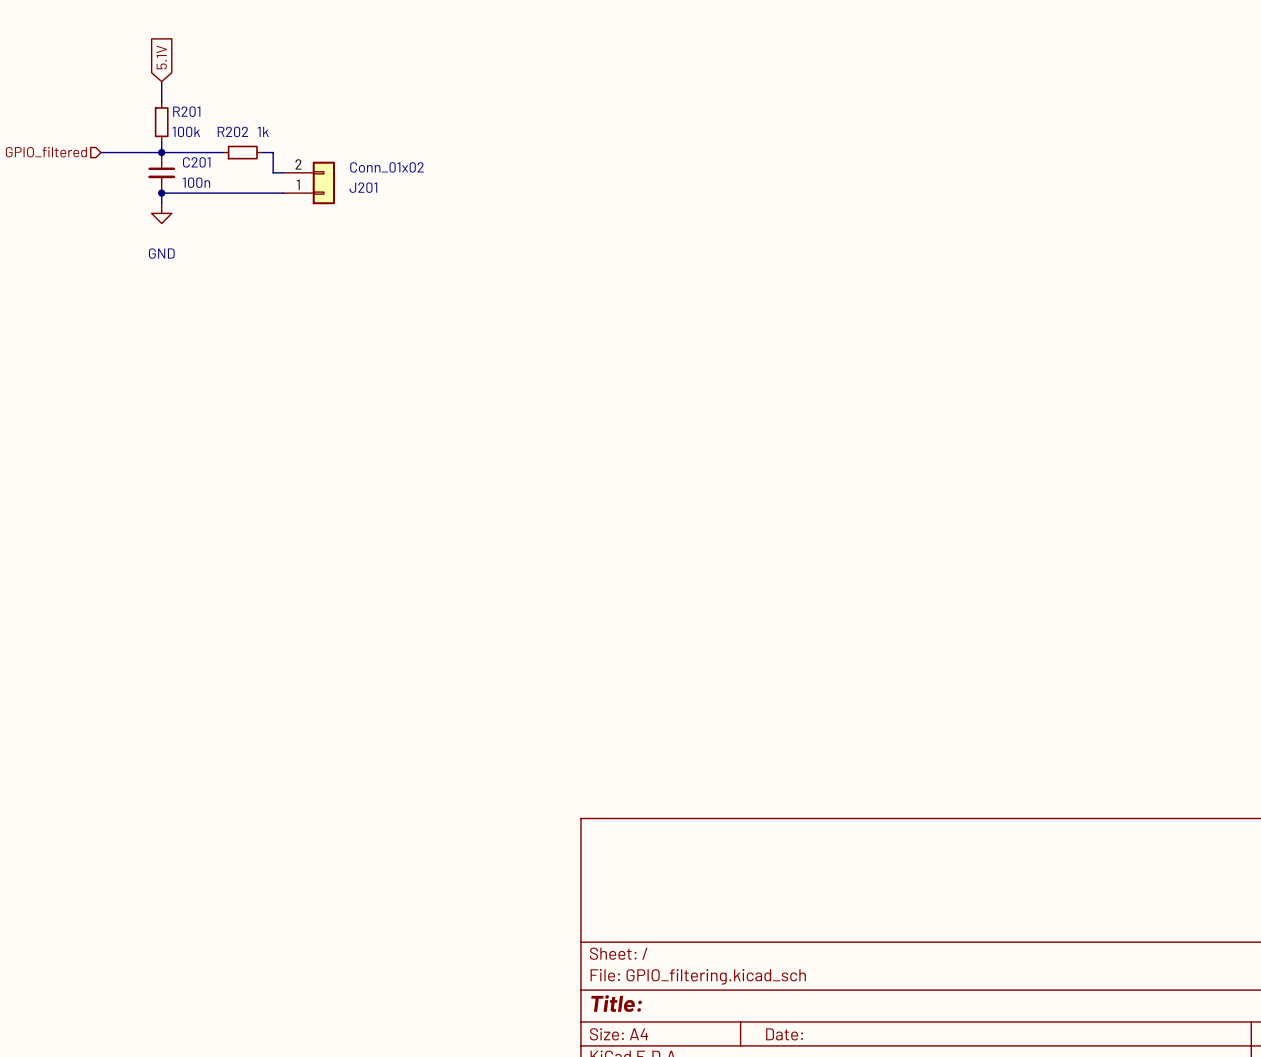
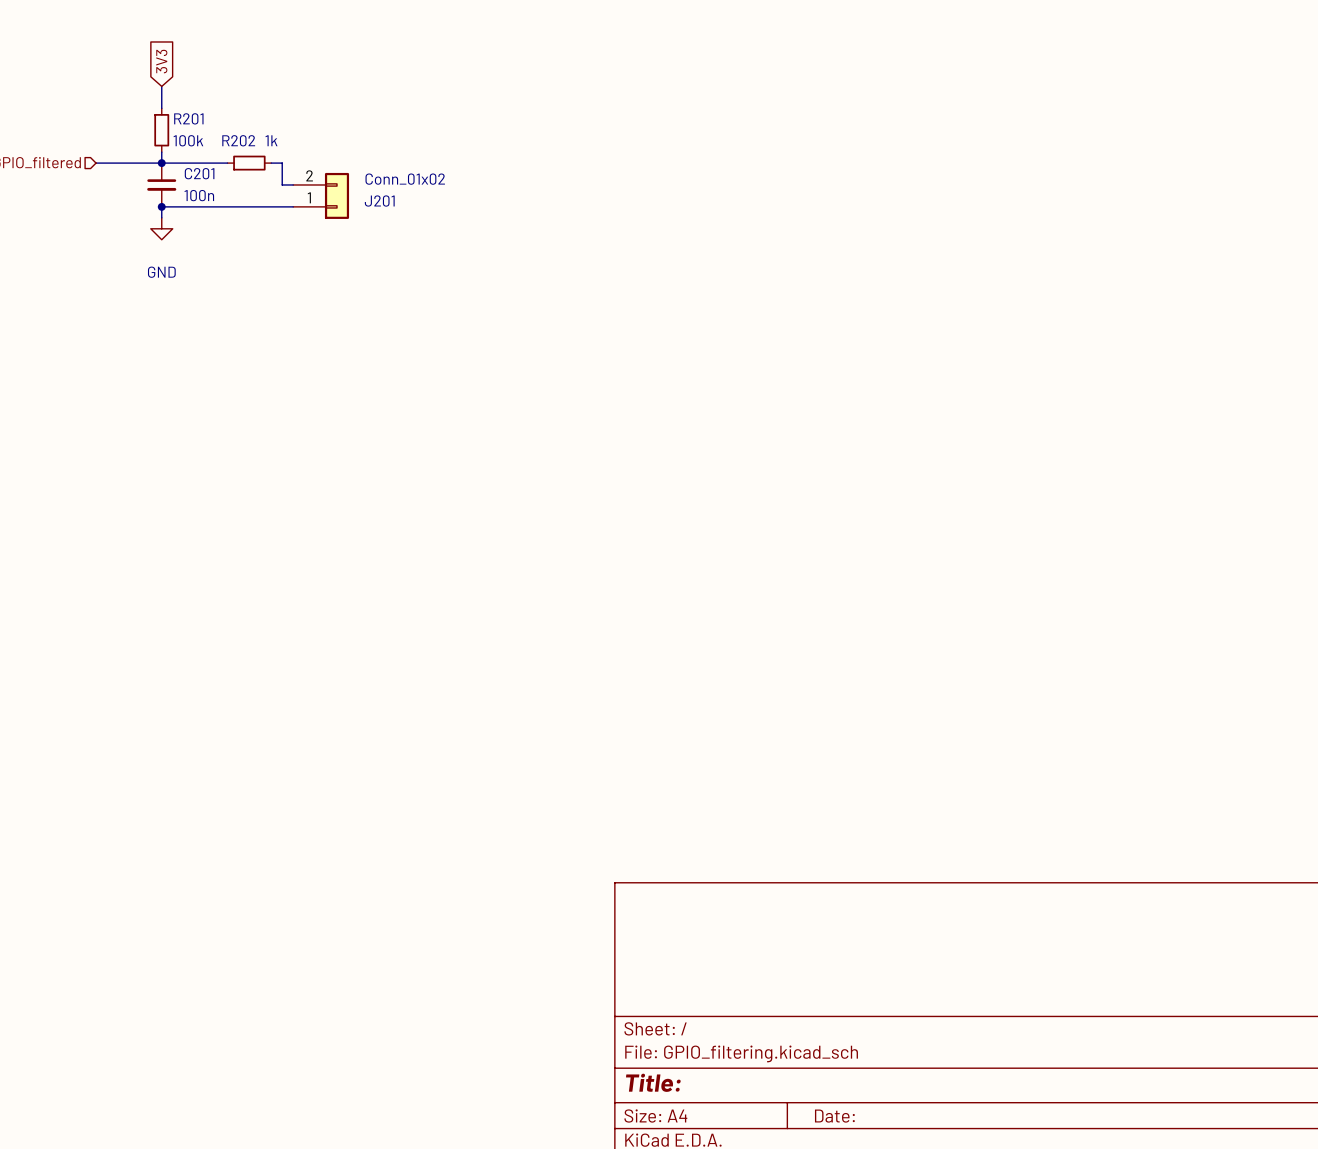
global label: 5.1V (161, 57) -> 3V3 (161, 61)

